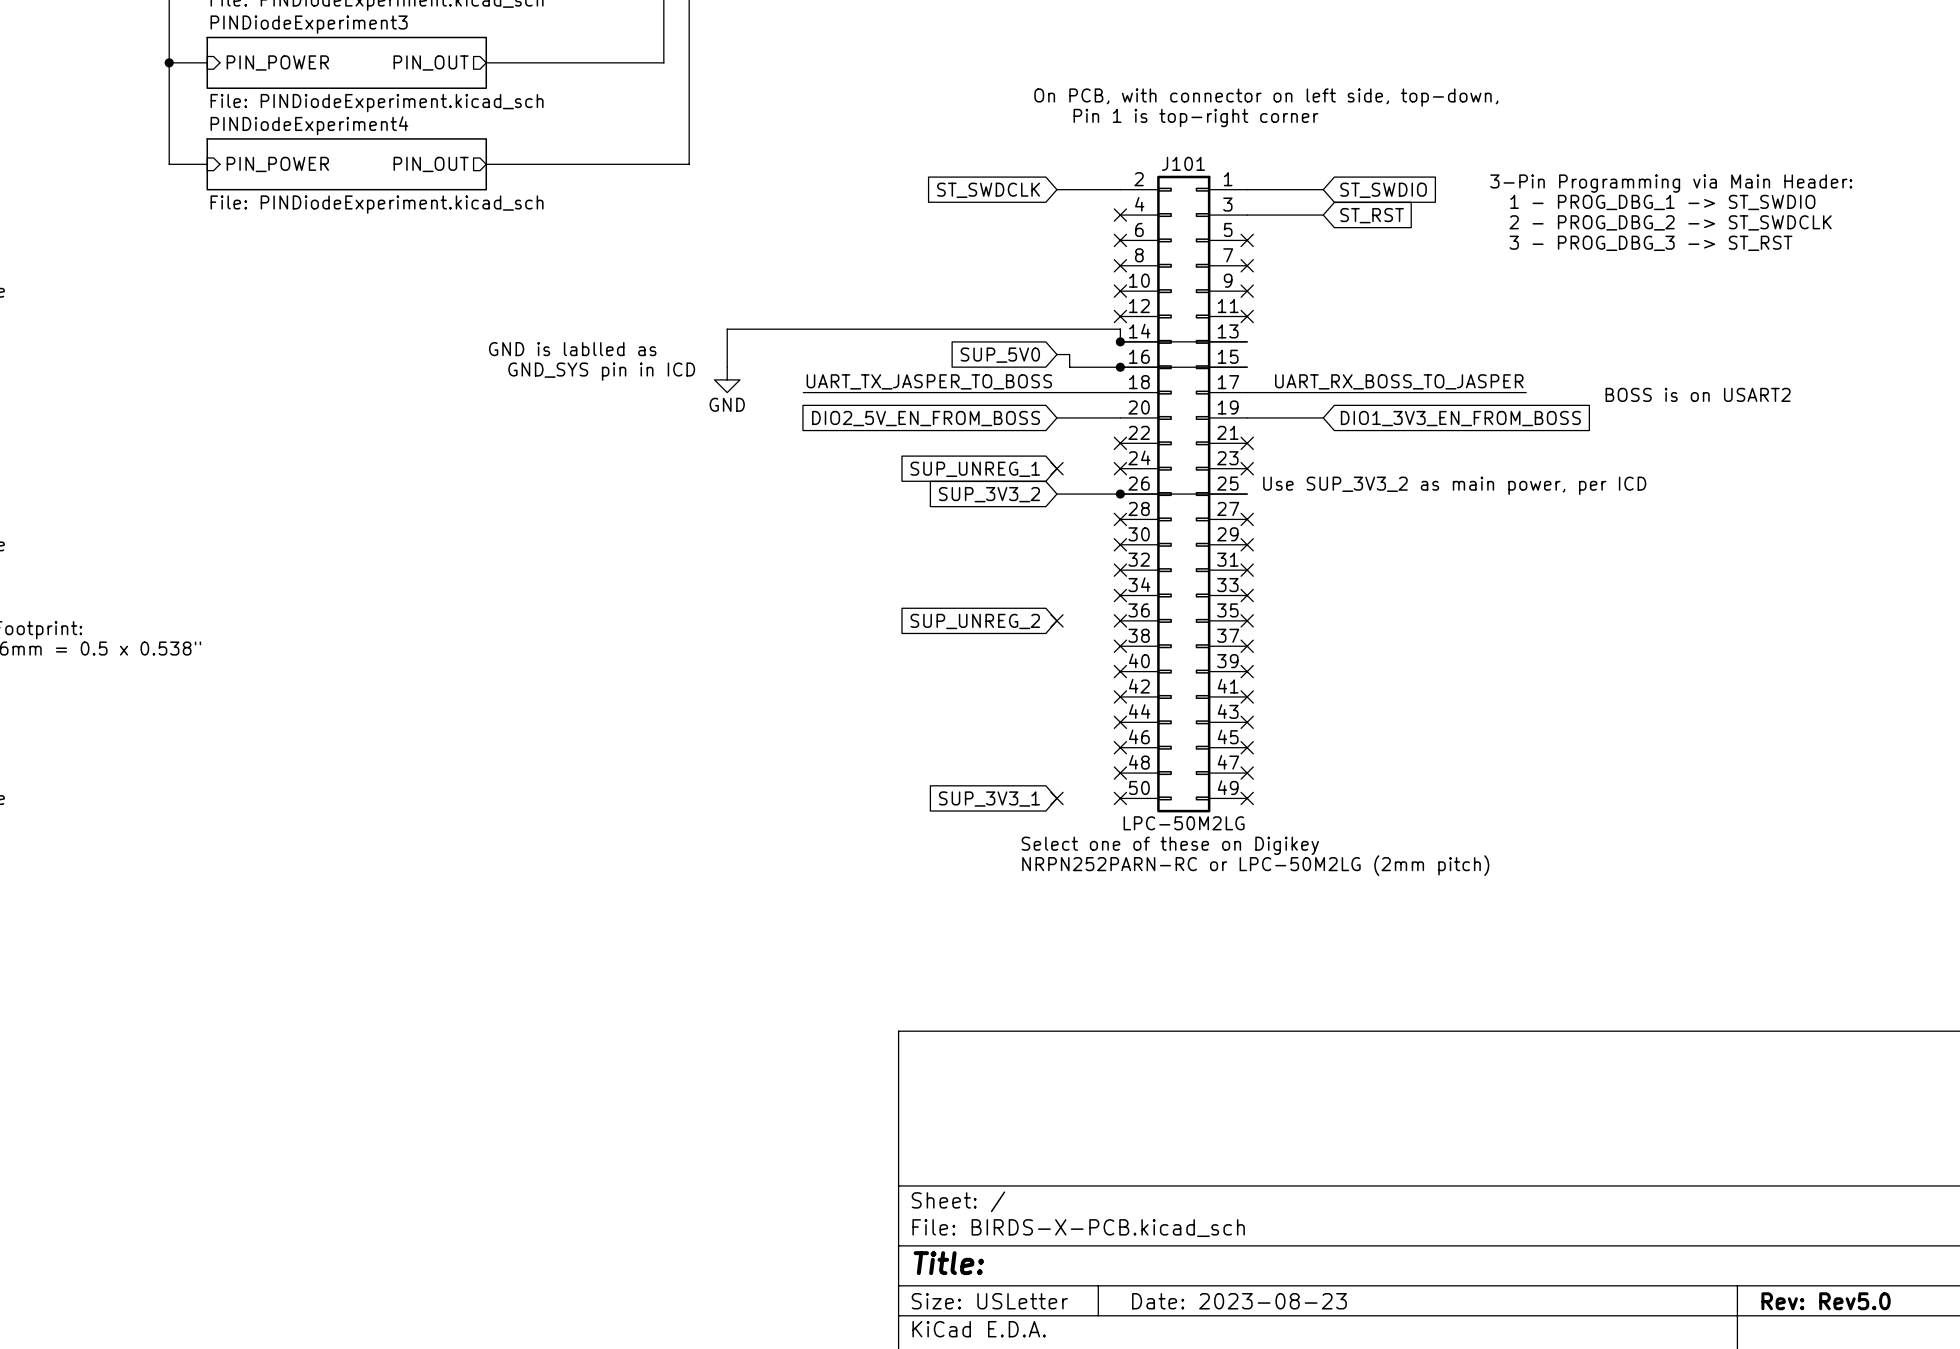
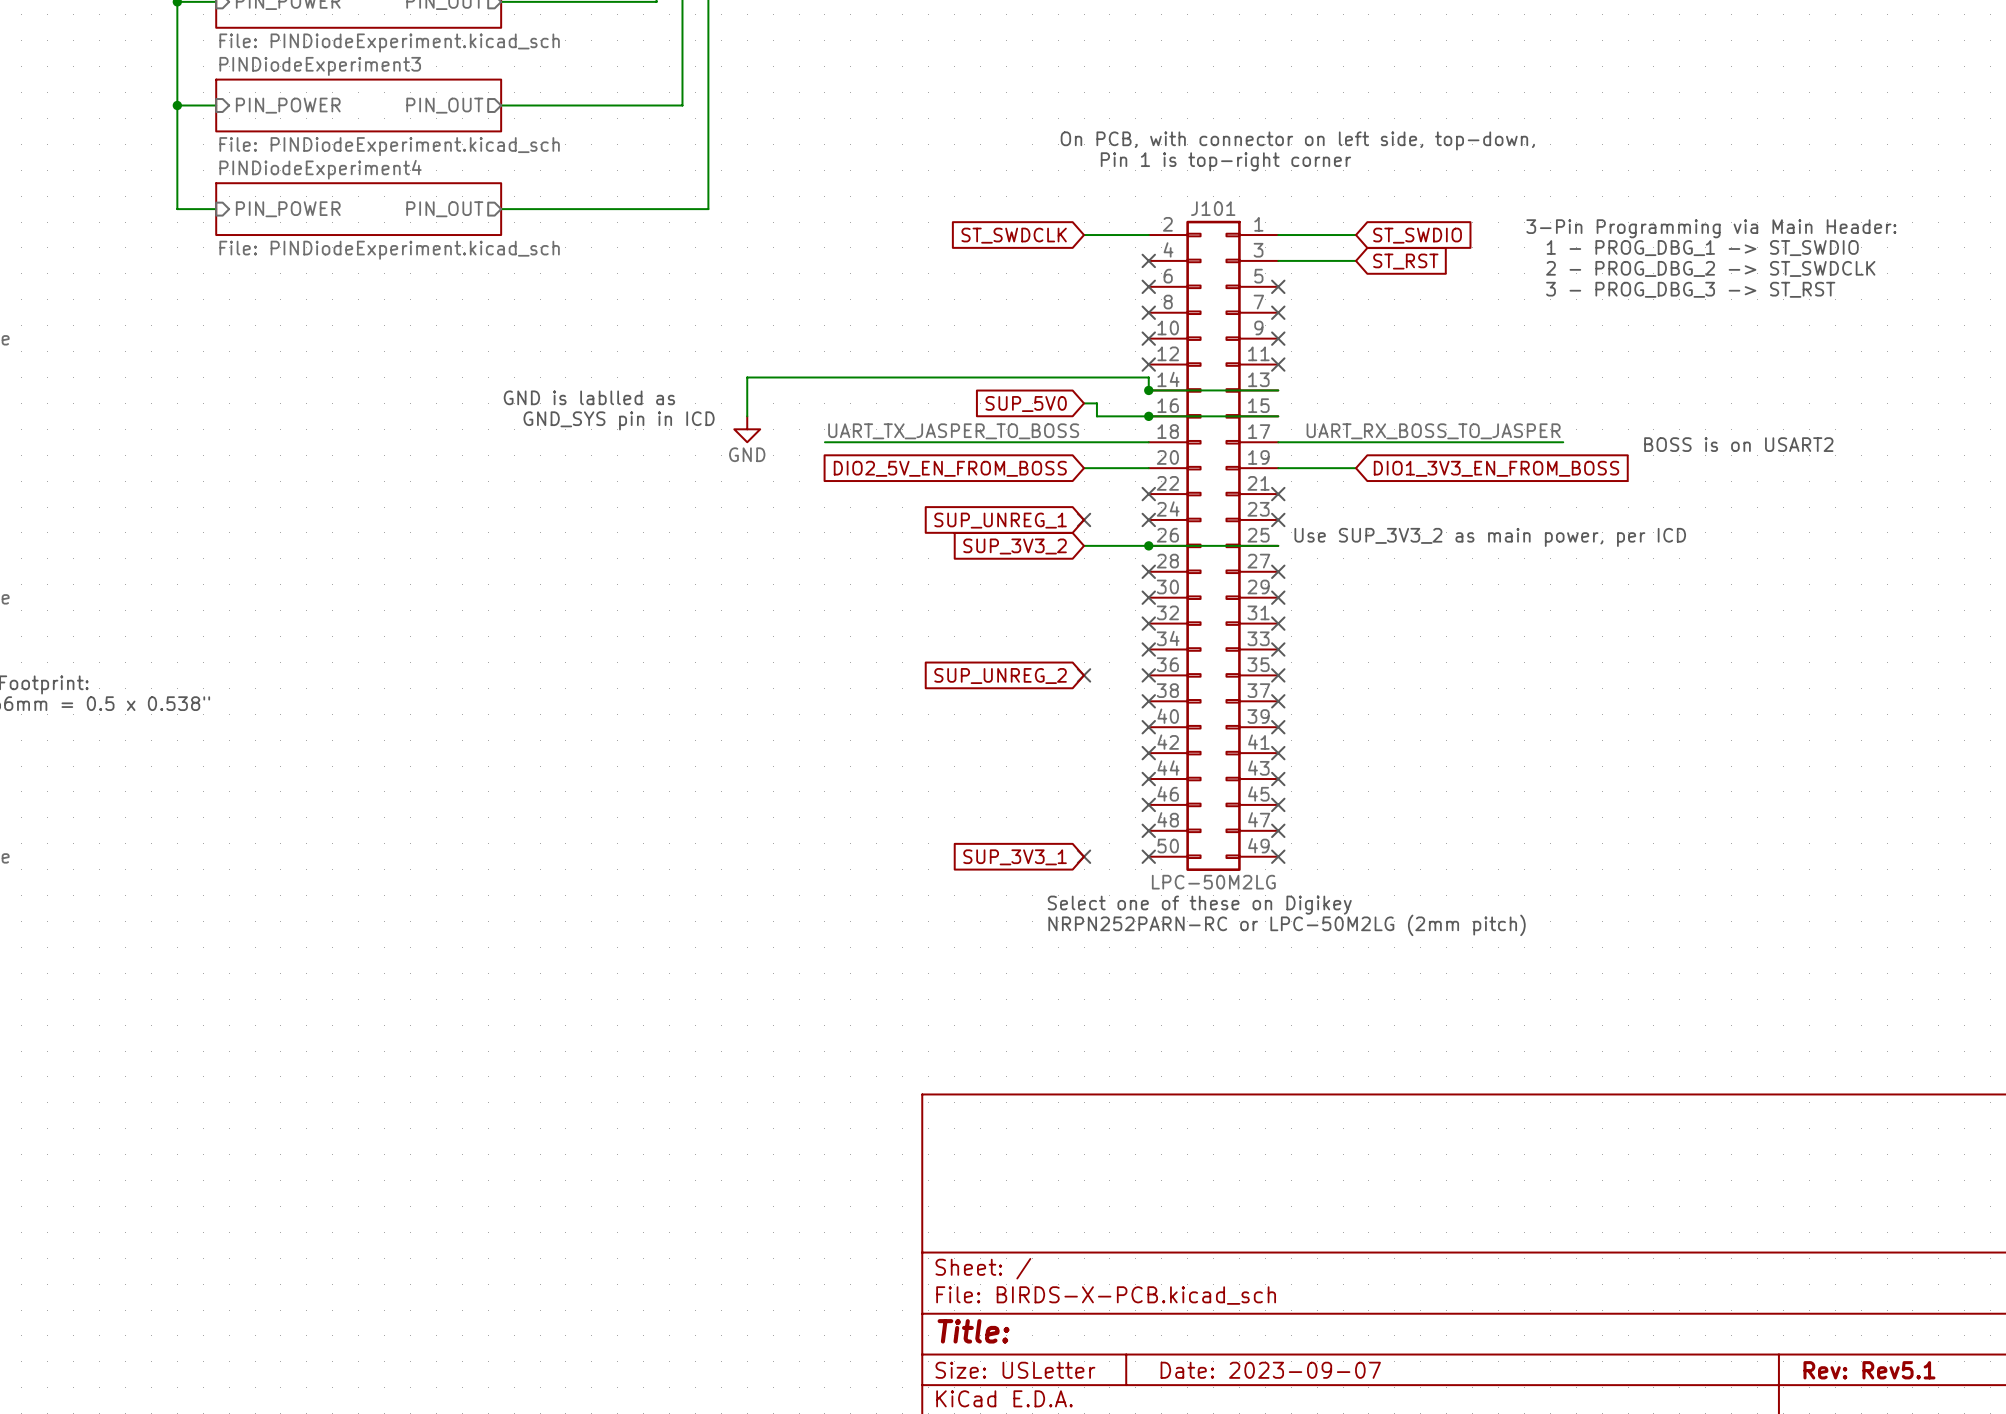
title block: Date: 2023-08-23 (1239, 1301) -> Date: 2023-09-07 (1270, 1370)
title block: Rev: Rev5.0 (1826, 1301) -> Rev: Rev5.1 (1869, 1370)

